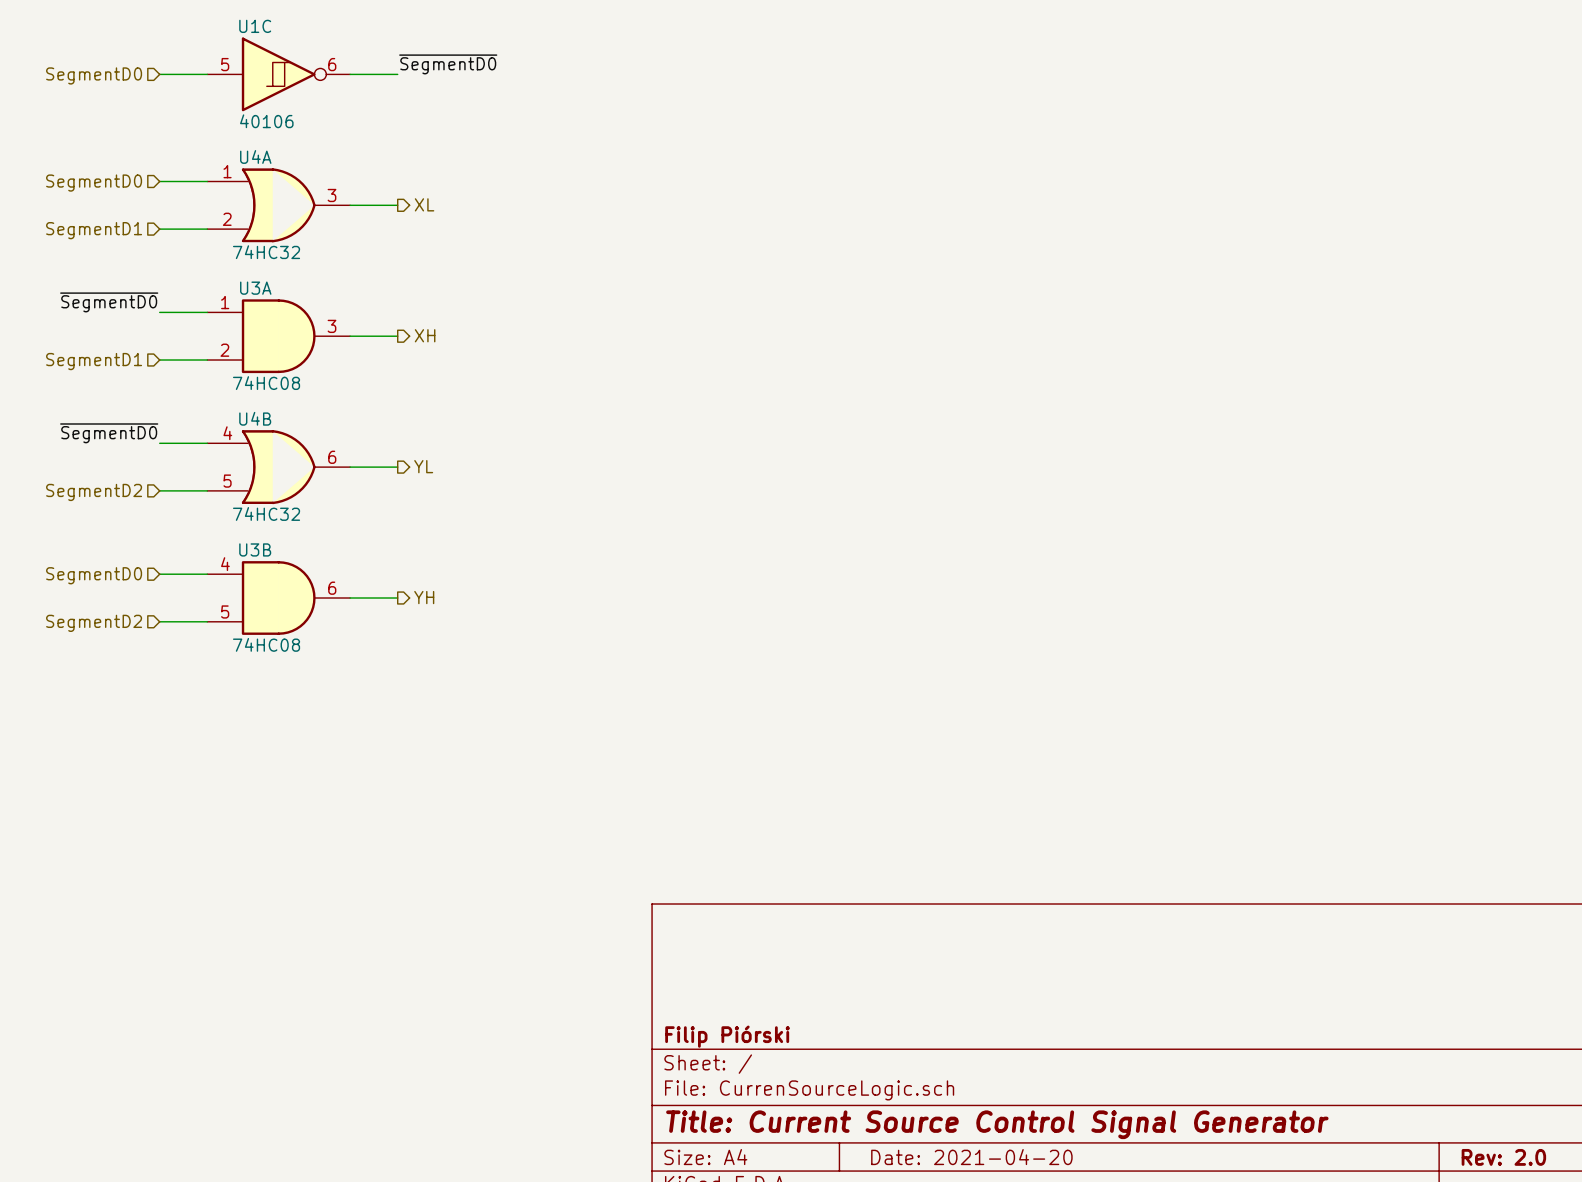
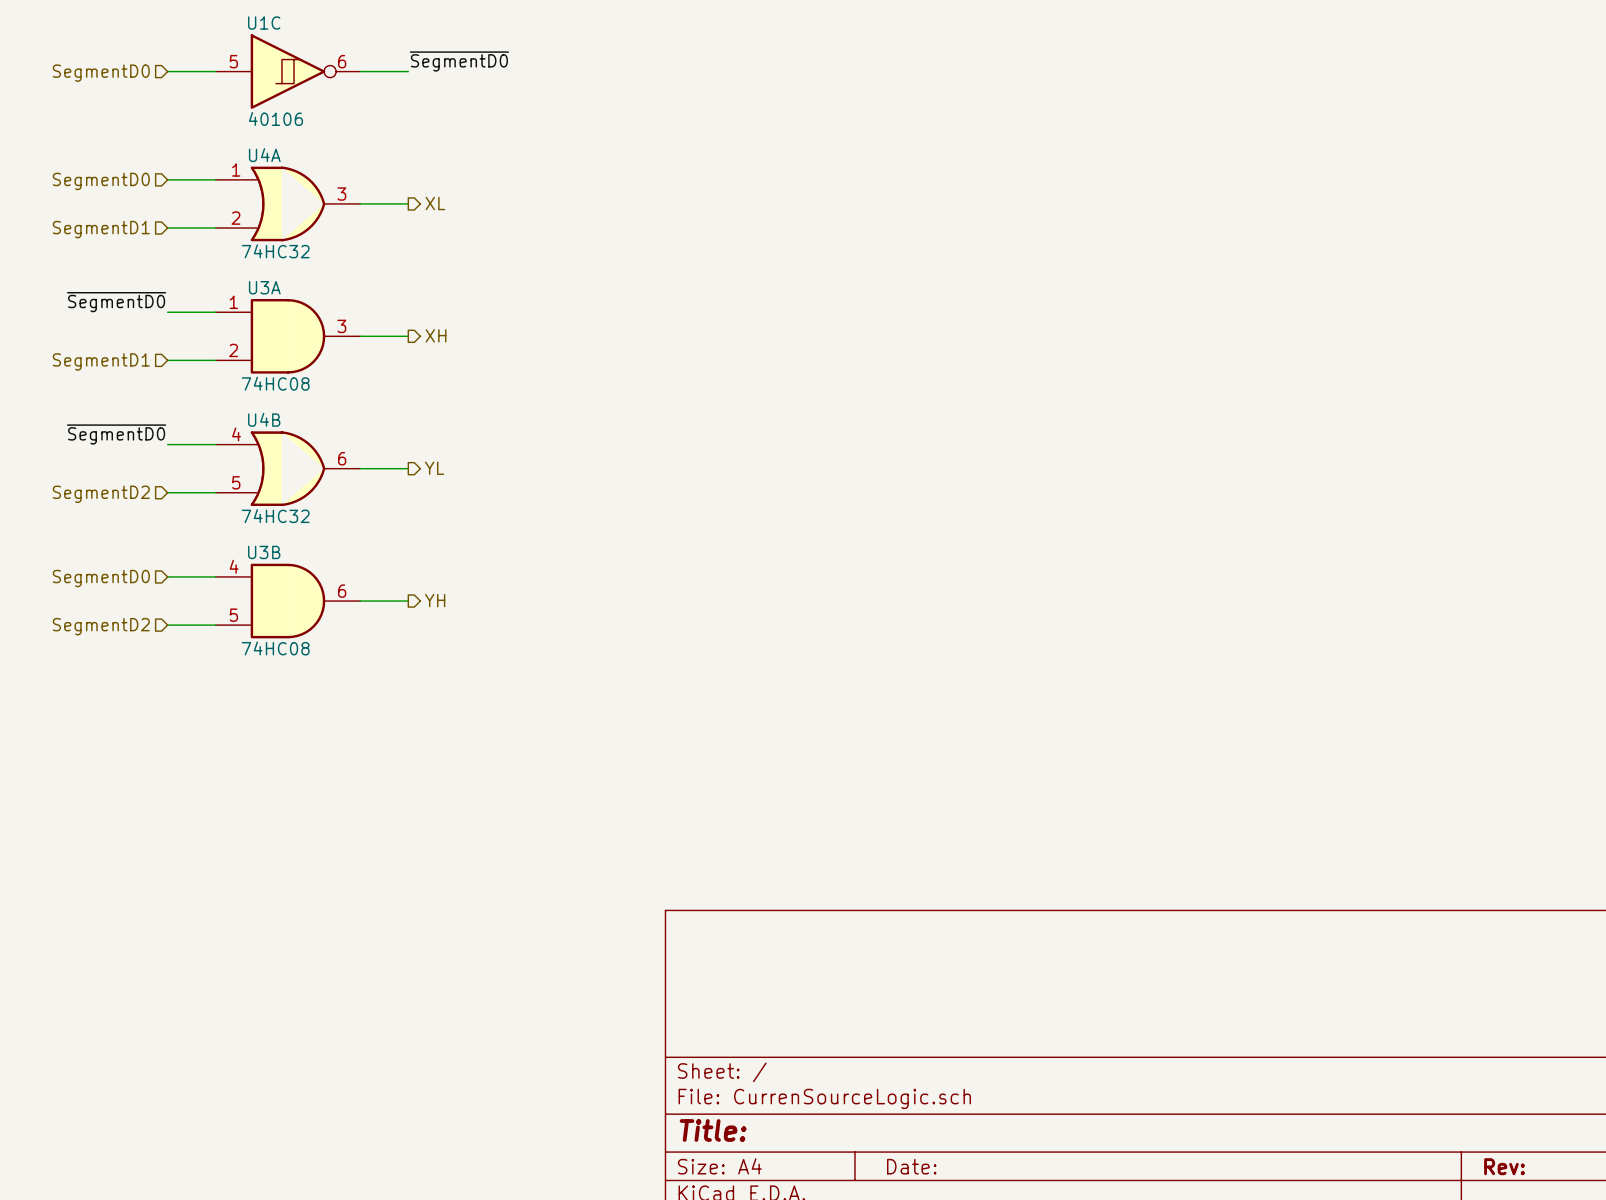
title block: Filip Piórski (727, 1036) -> none
title block: Title: Current Source Control Signal Generator (997, 1124) -> Title: (713, 1130)
title block: Date: 2021-04-20 (971, 1157) -> Date: (911, 1166)
title block: Rev: 2.0 (1503, 1157) -> Rev: (1504, 1166)

